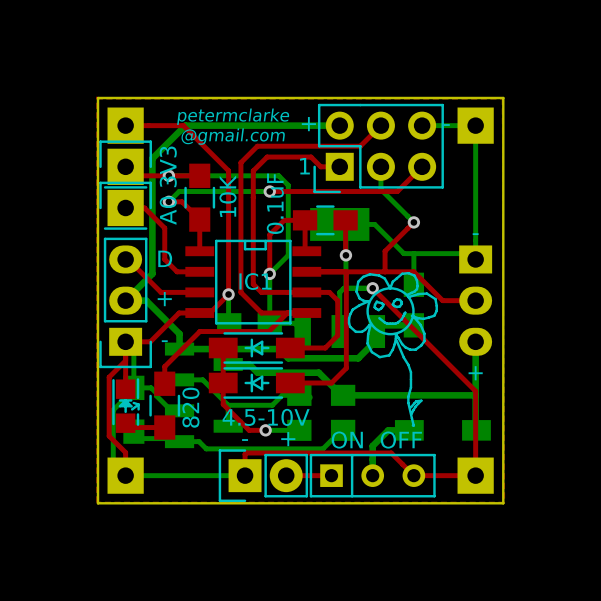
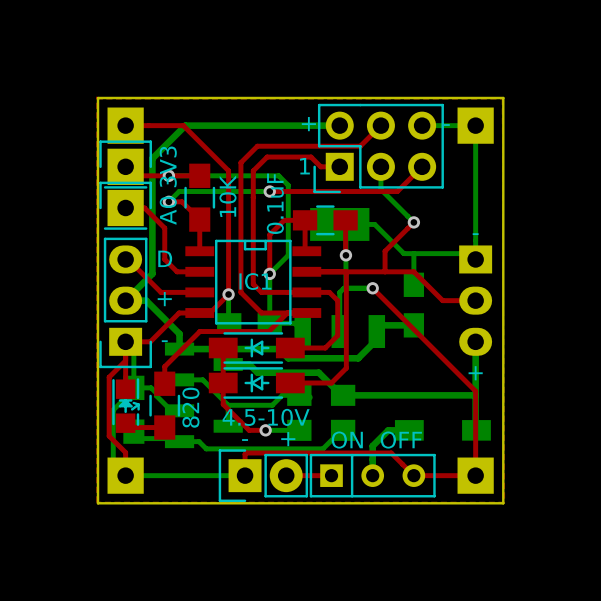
text: petermclarke (233, 116) -> none
text: @gmail.com (233, 136) -> none
drawing: [347, 271, 438, 427] -> none

